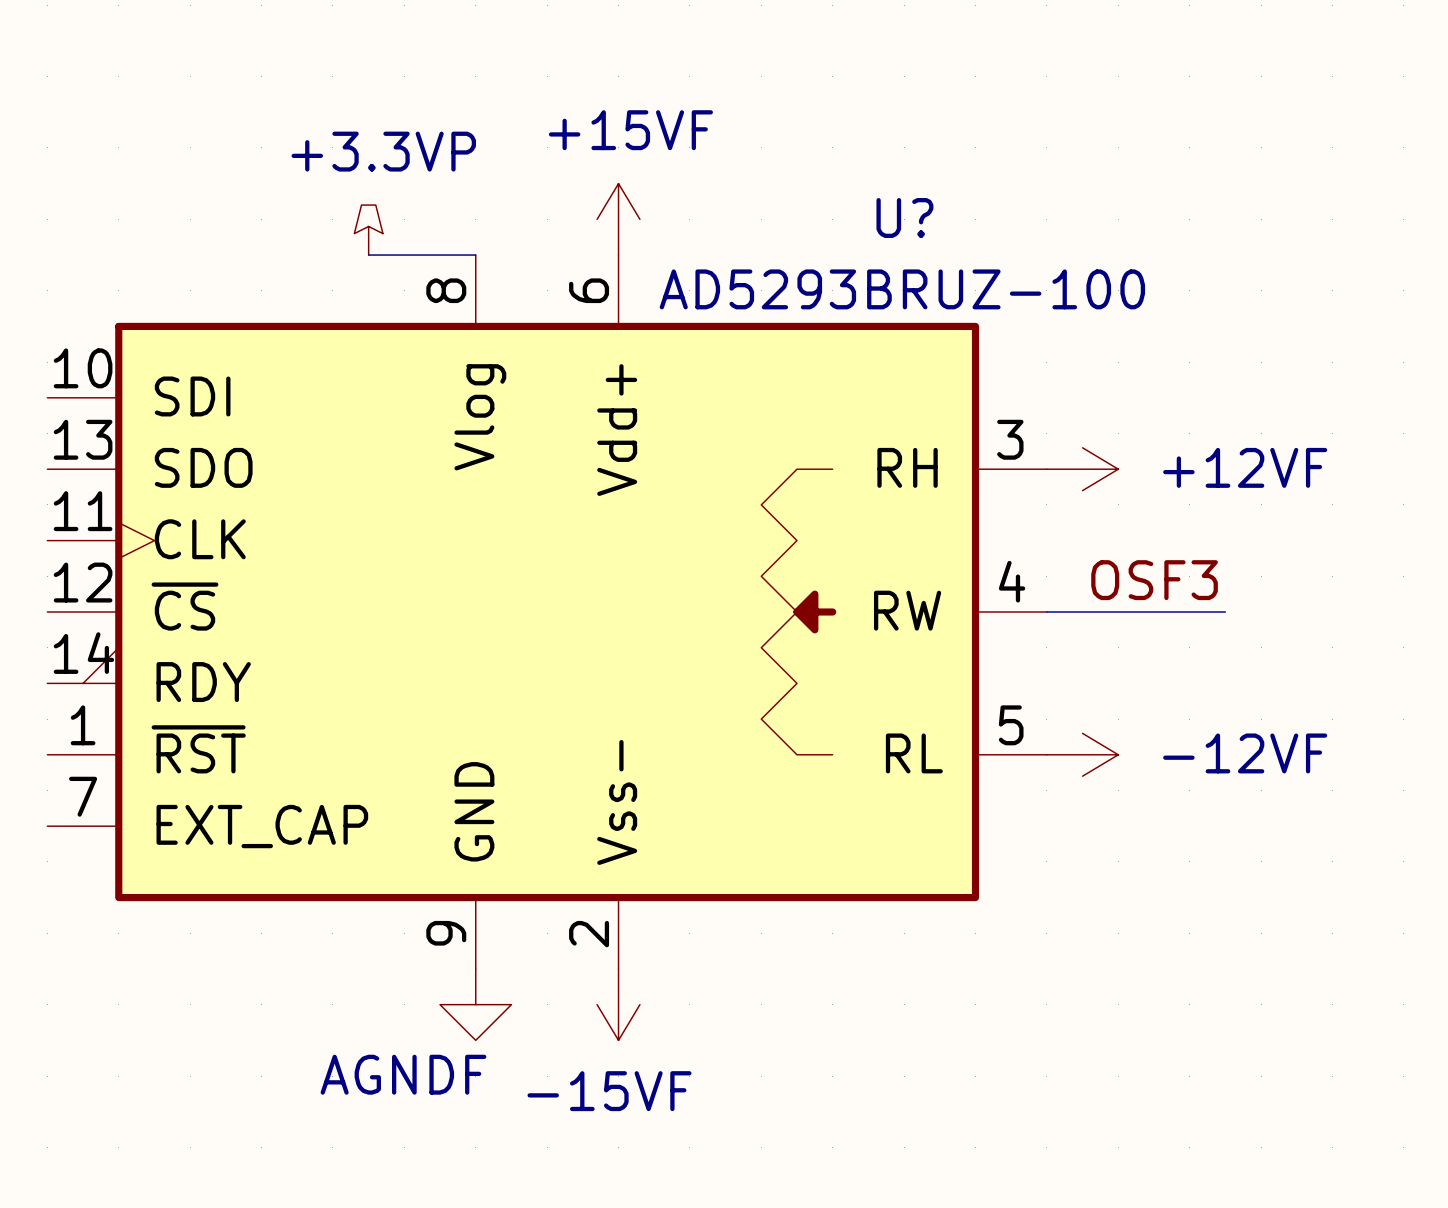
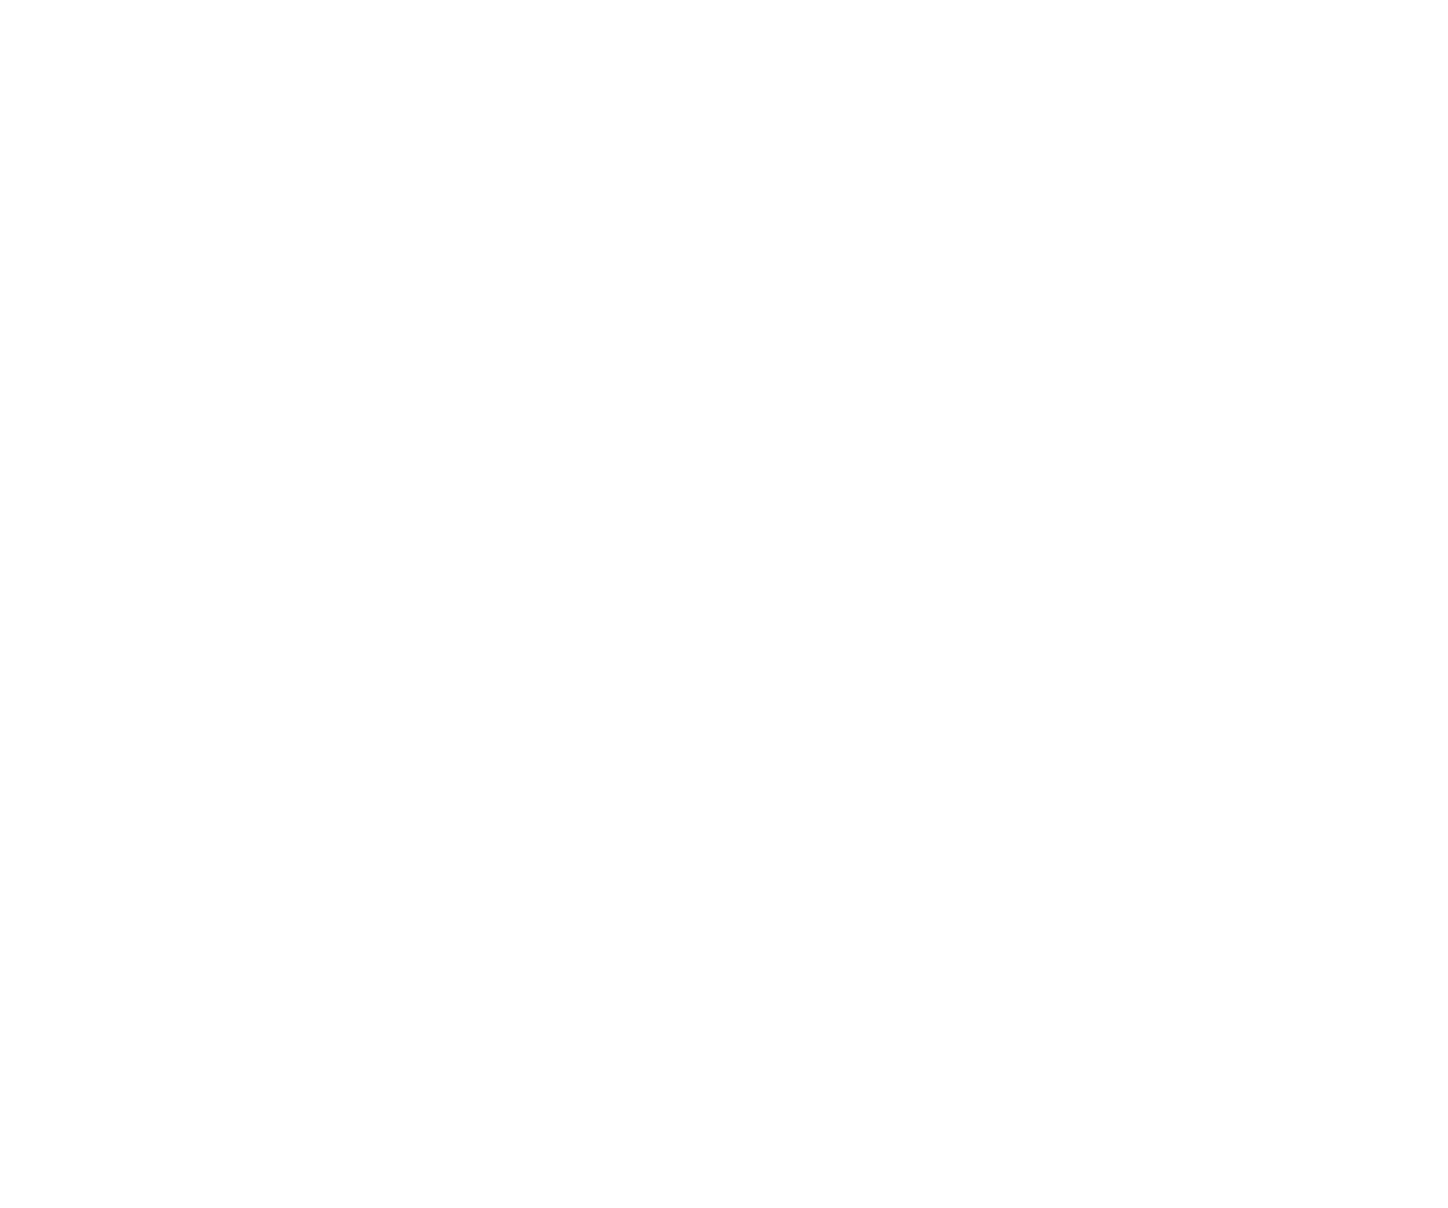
power symbol: +15VF (618, 219) -> none
power symbol: +3.3VP (368, 230) -> none
wire: (368, 255) (475, 255) -> none
power symbol: +12VF (1082, 469) -> none
label: OSF3 (1154, 580) -> none
U?: AD5293BRUZ-100 (547, 611) -> none
wire: (1046, 611) (1225, 611) -> none
power symbol: -12VF (1082, 754) -> none
power symbol: AGNDF (475, 1004) -> none
power symbol: -15VF (618, 1004) -> none

